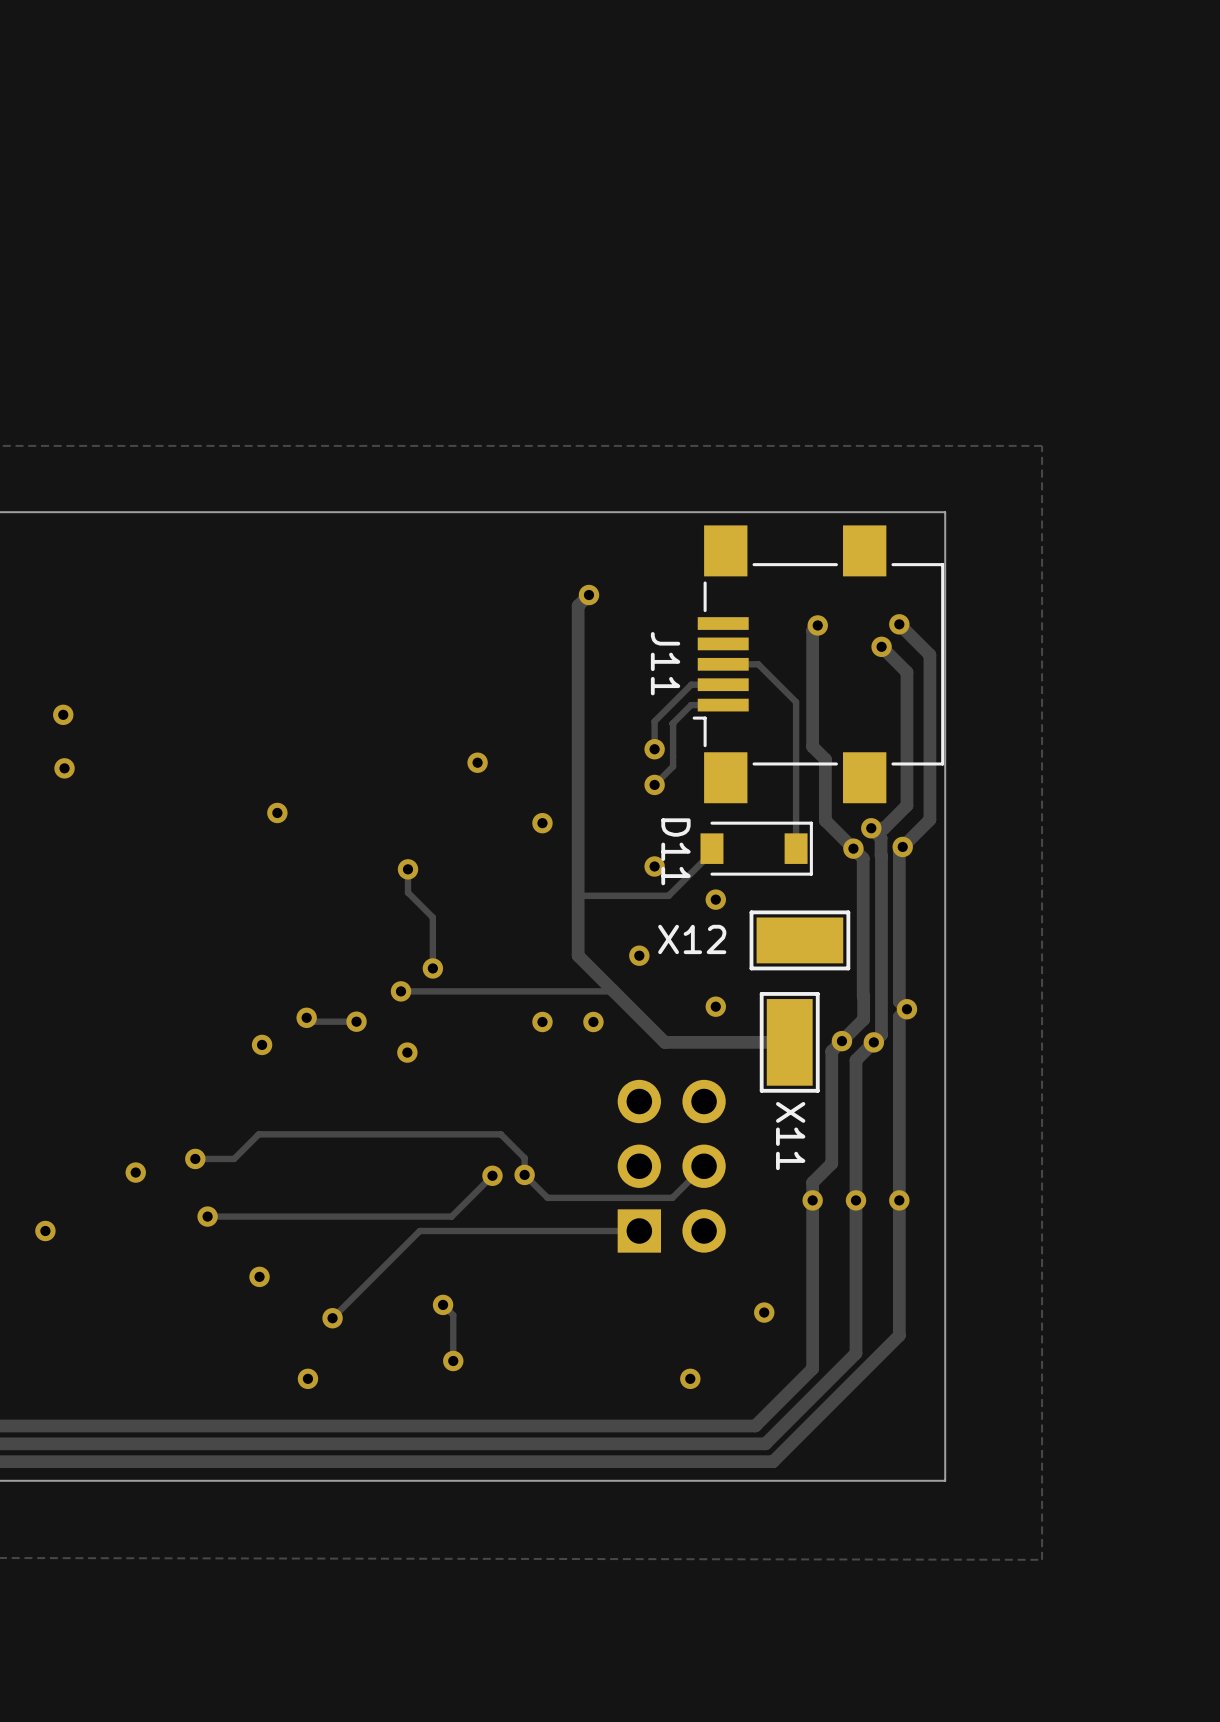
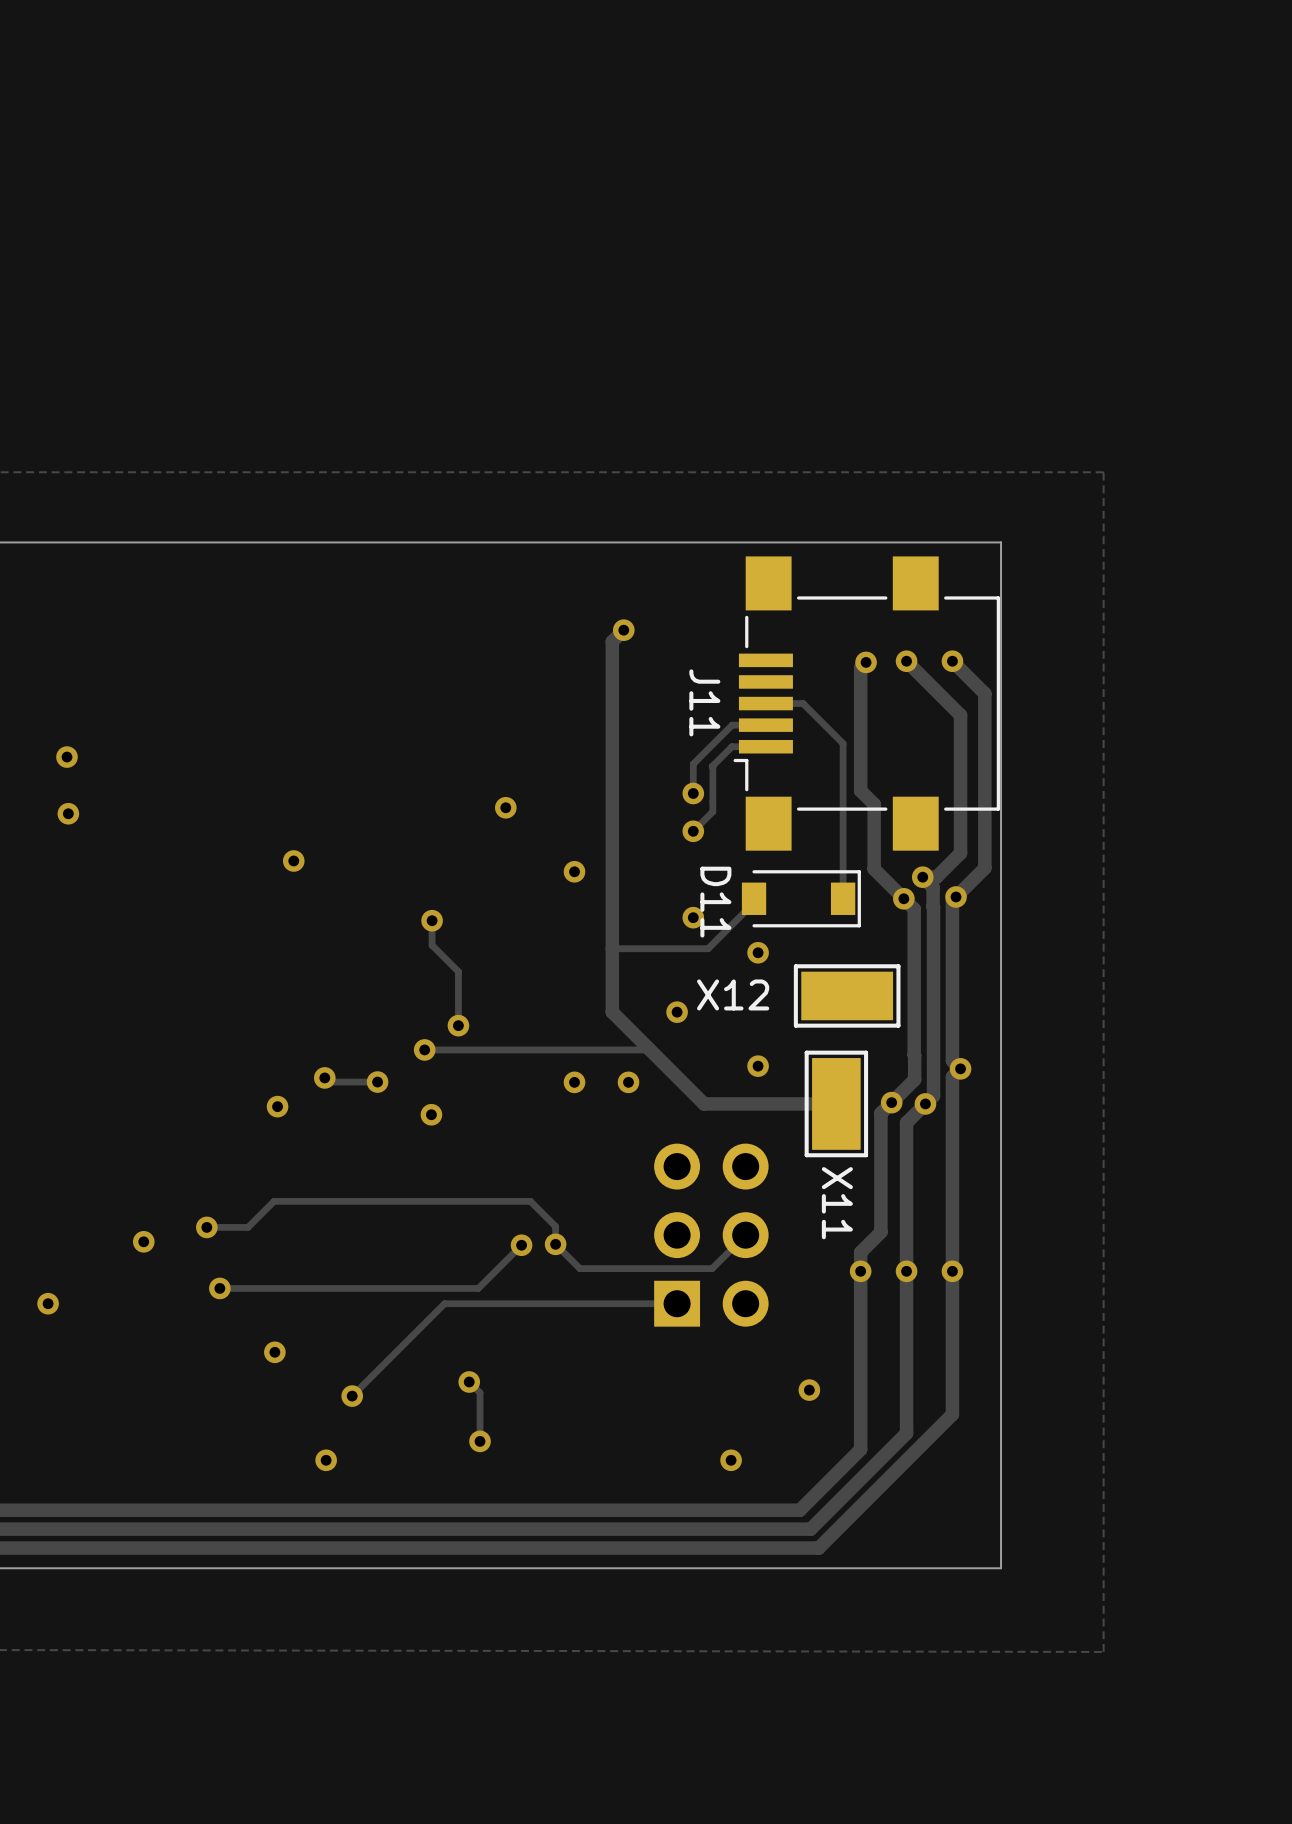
track: (881, 646) (906, 672) (906, 675) -> (906, 661) (960, 715)
via position: (881, 646) -> (906, 661)

